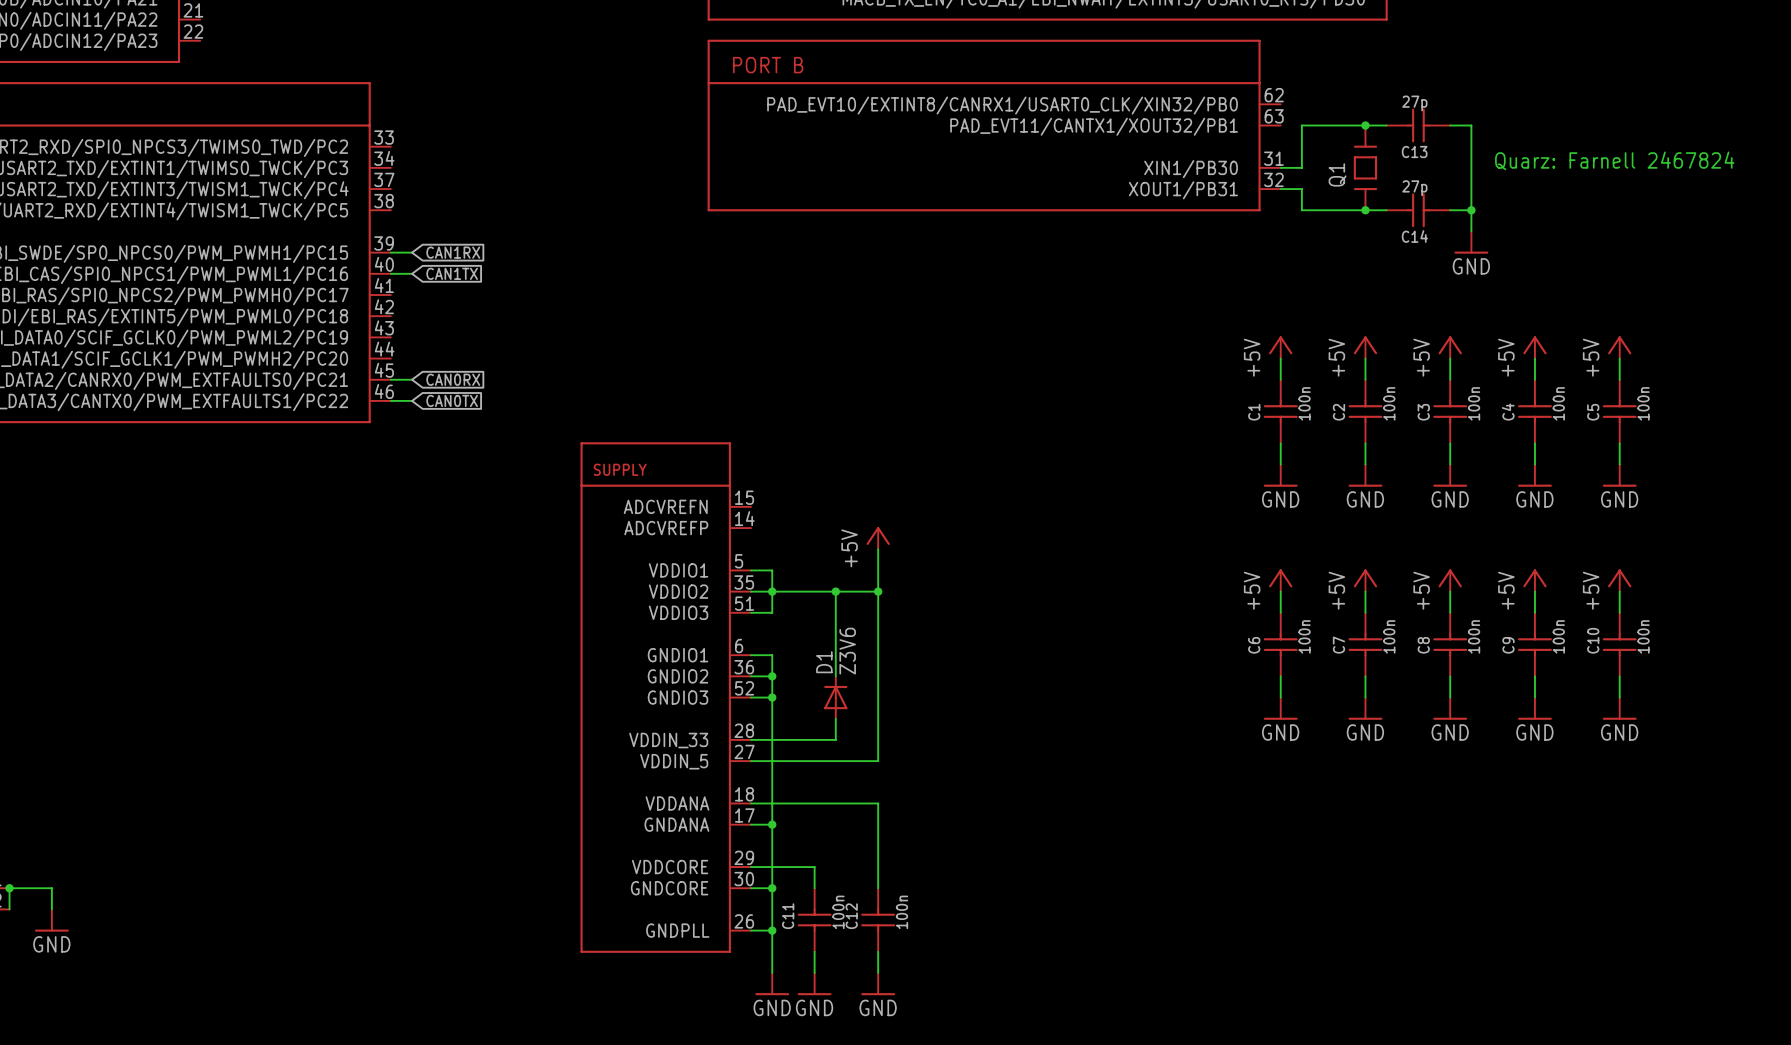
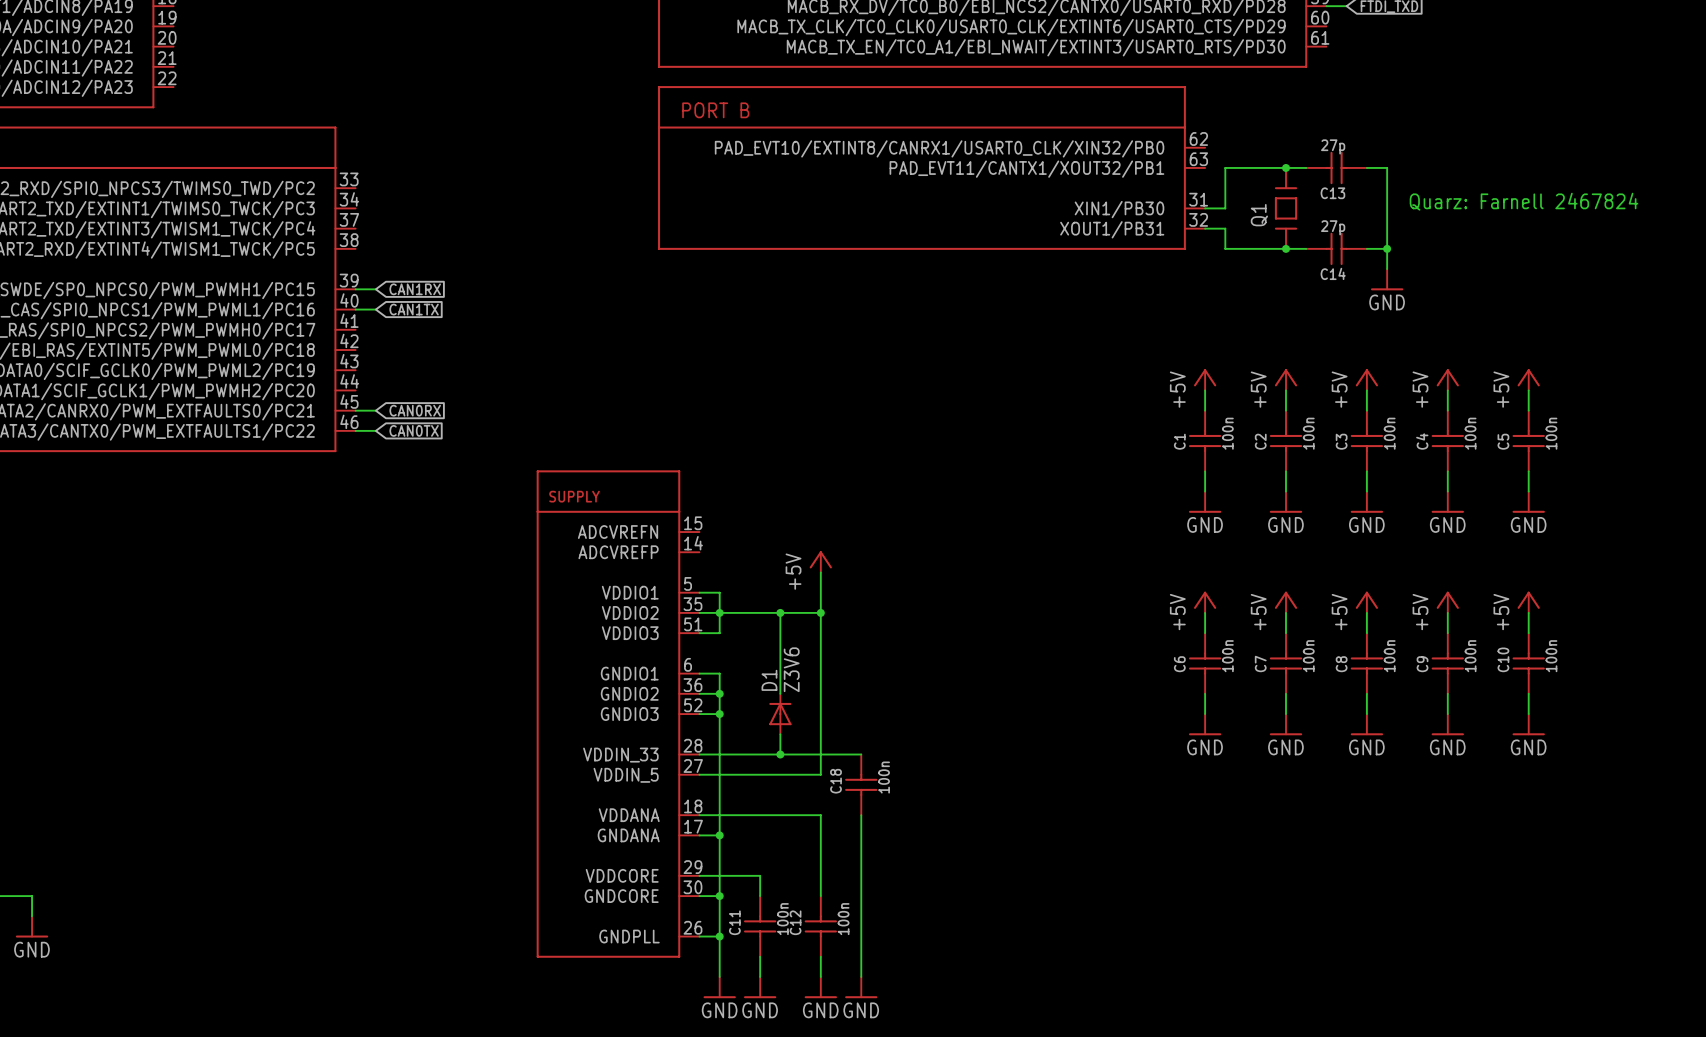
wire: none -> (780, 754) (861, 754)
junction: none -> (780, 754)
C18: none -> 100n (861, 784)
wire: none -> (861, 815) (861, 976)
power symbol: none -> GND (861, 987)

